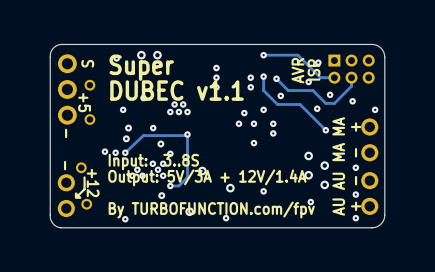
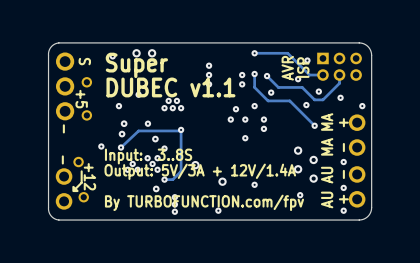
via: (115, 152) -> none
via: none -> (174, 197)
via: none -> (174, 204)
via: (189, 211) -> none
via: (125, 219) -> none
via: none -> (174, 211)

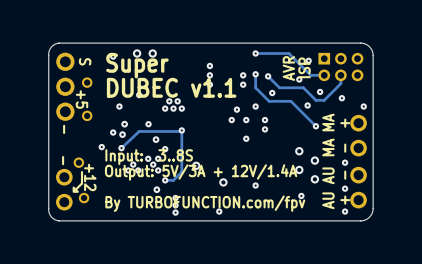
via: none -> (113, 132)

